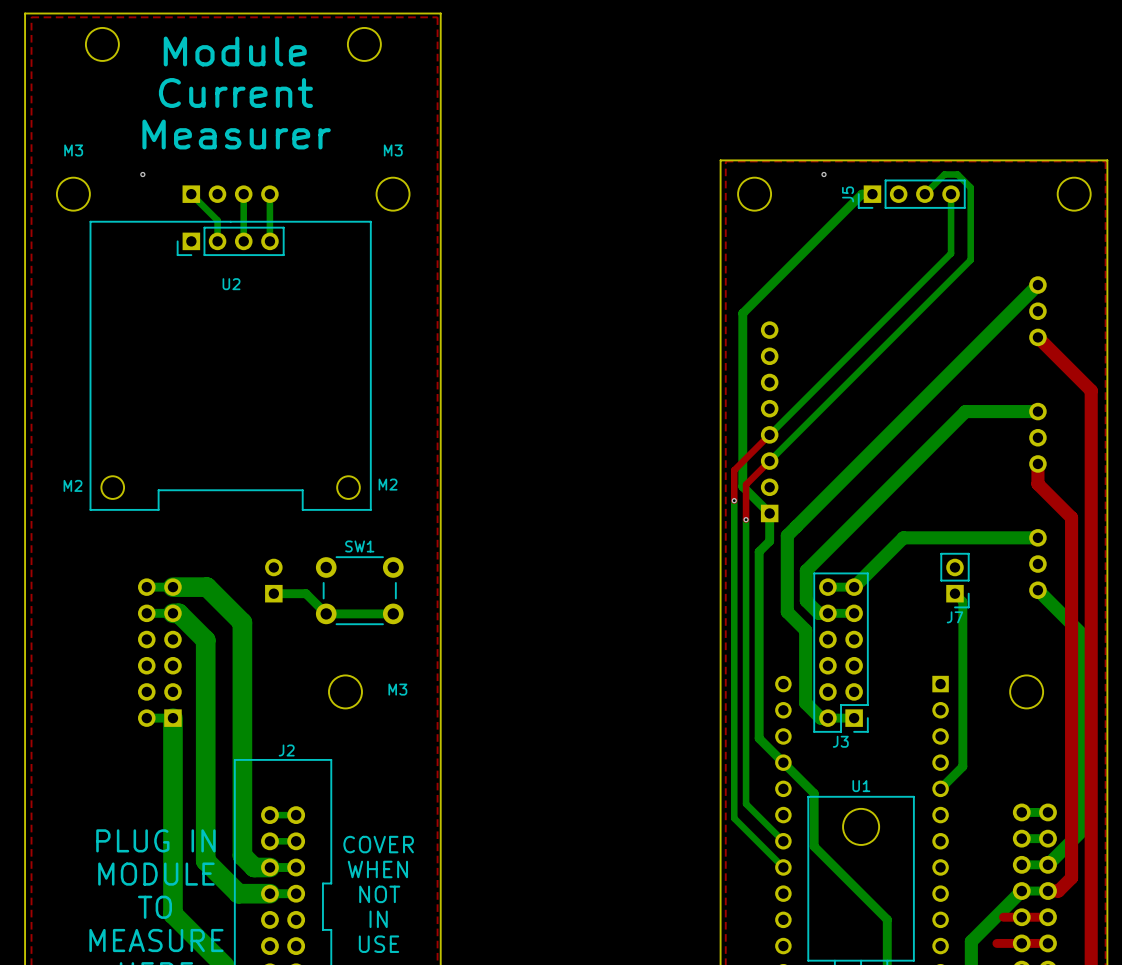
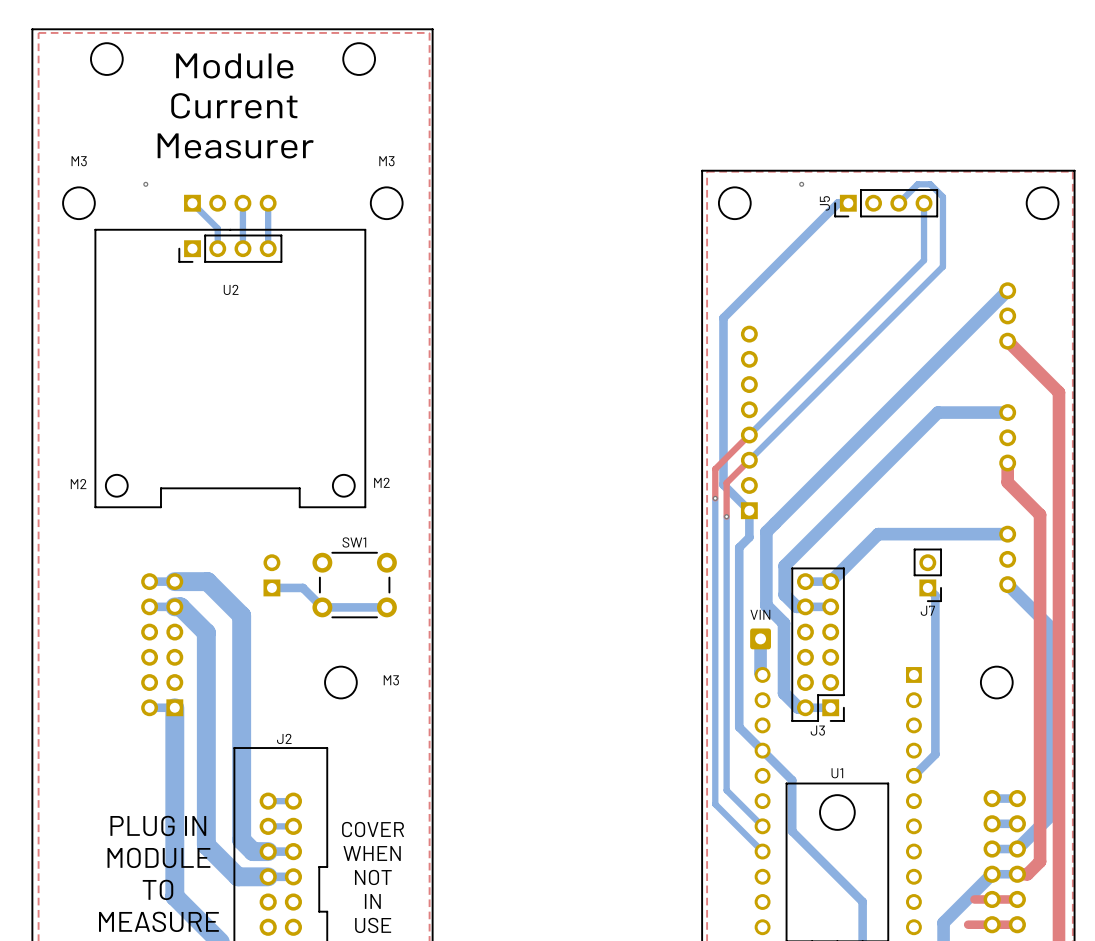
text: none -> VIN (760, 614)
bottom track: none -> (760, 638) (760, 672) (762, 674)
part: none -> (760, 638)

